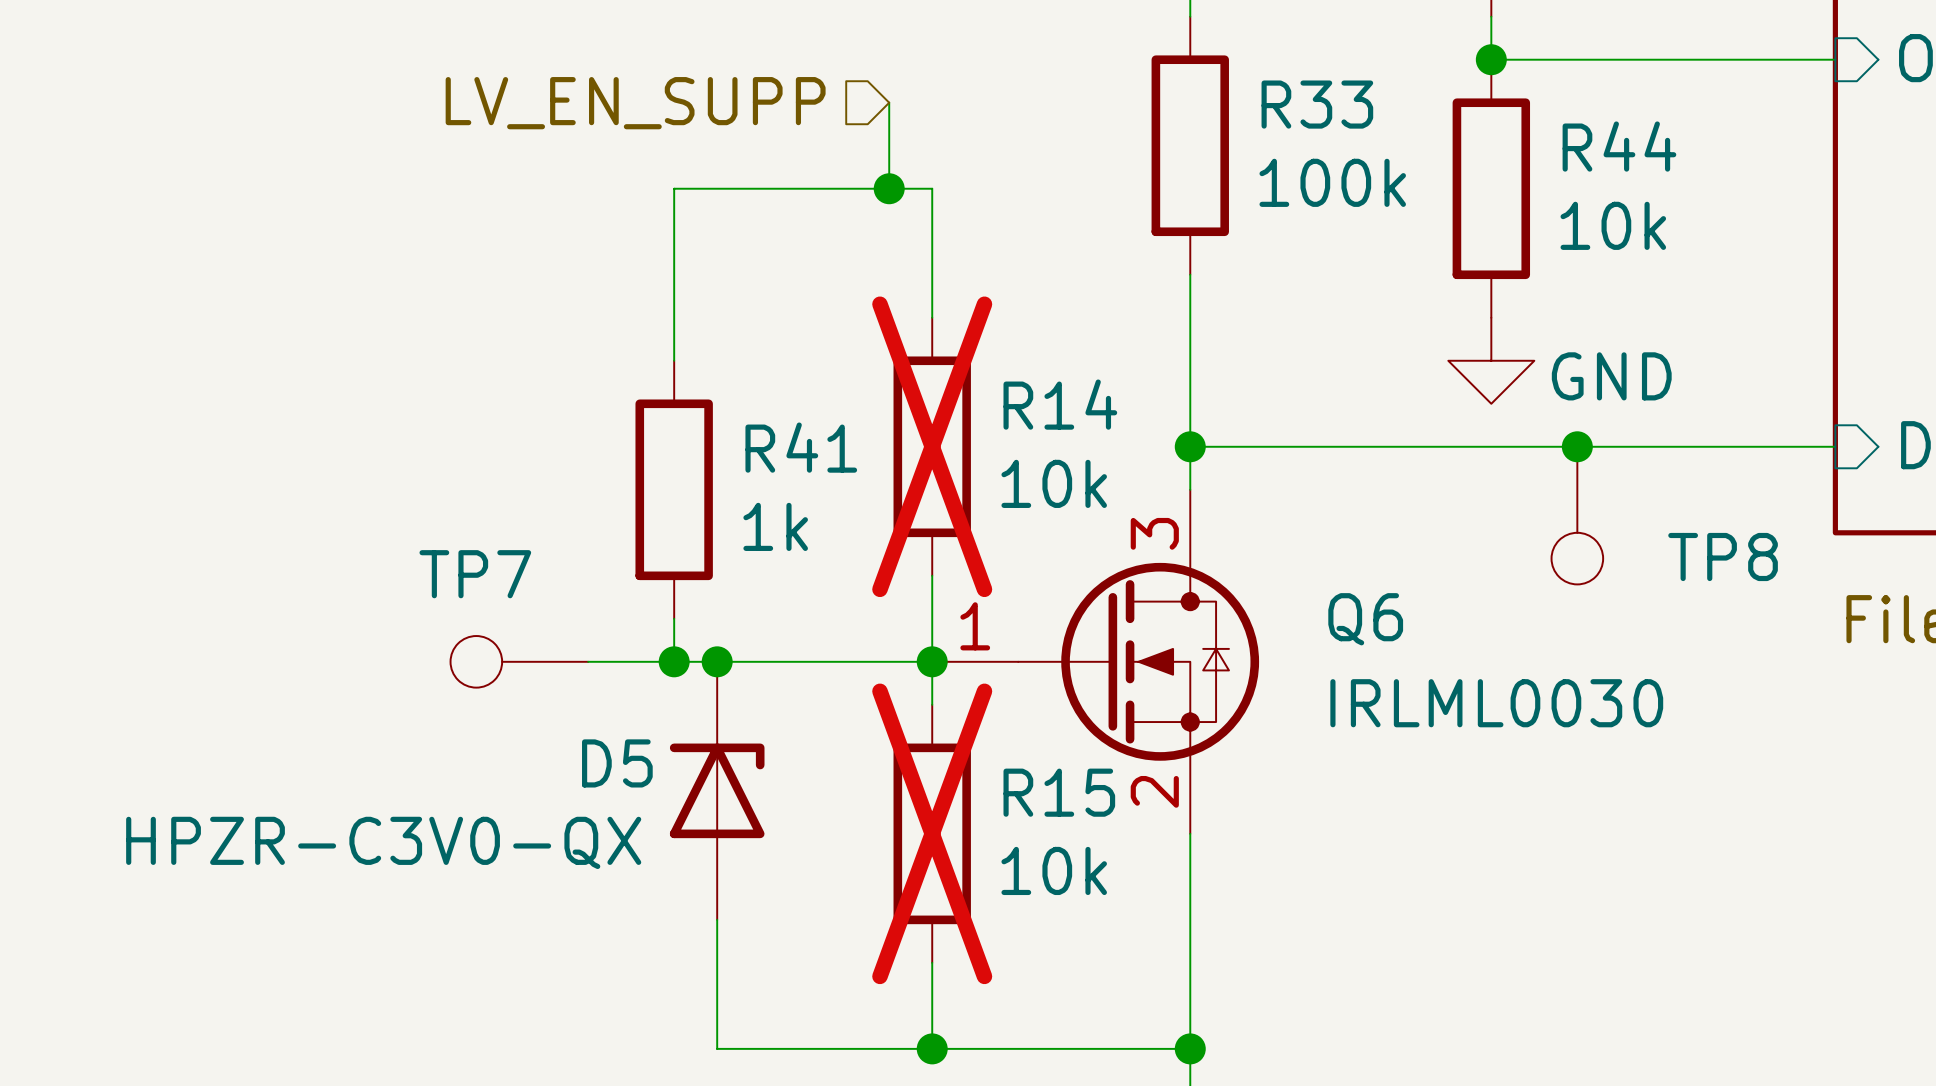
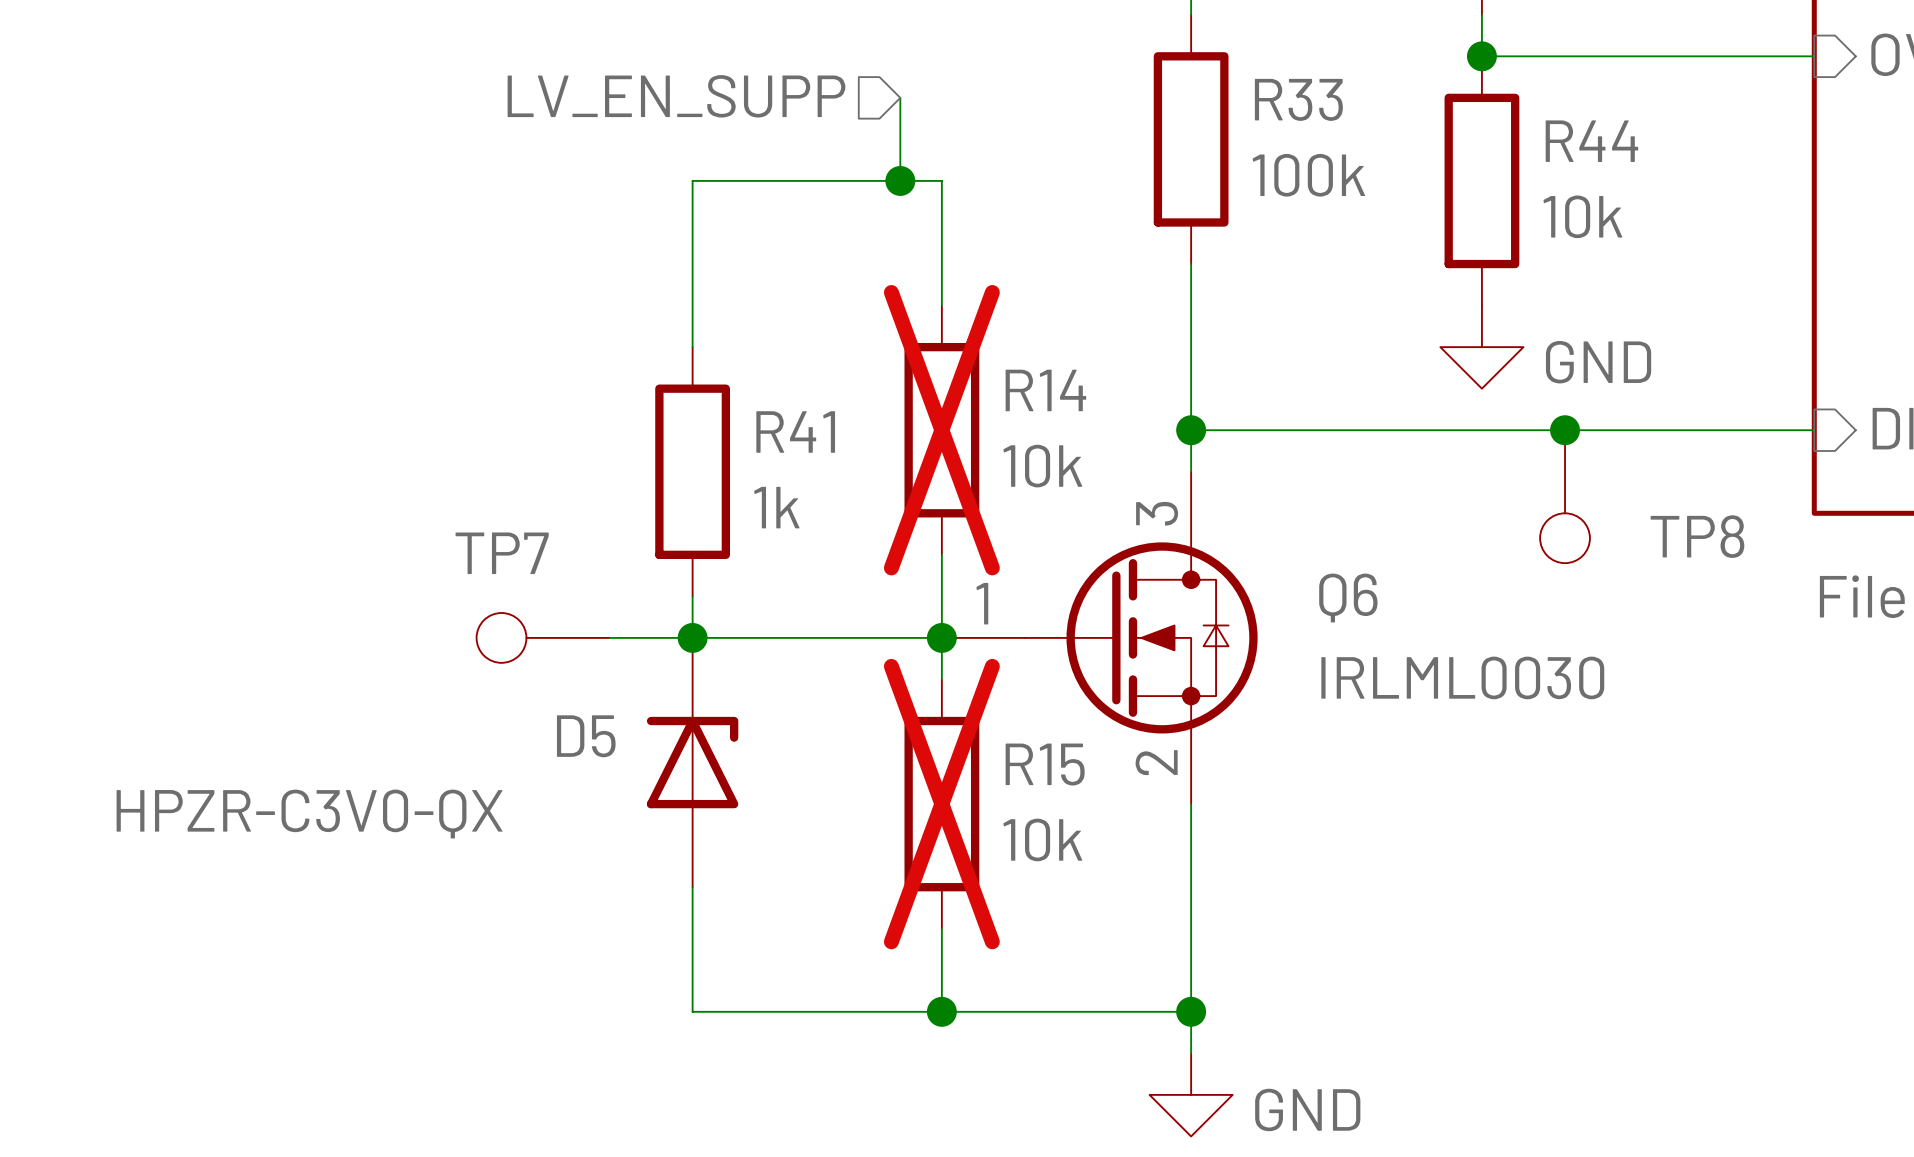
junction: (717, 661) -> none
D5 position: (717, 790) -> (692, 762)
wire: (717, 919) (717, 1048) -> (692, 887) (692, 1011) (734, 1011)

